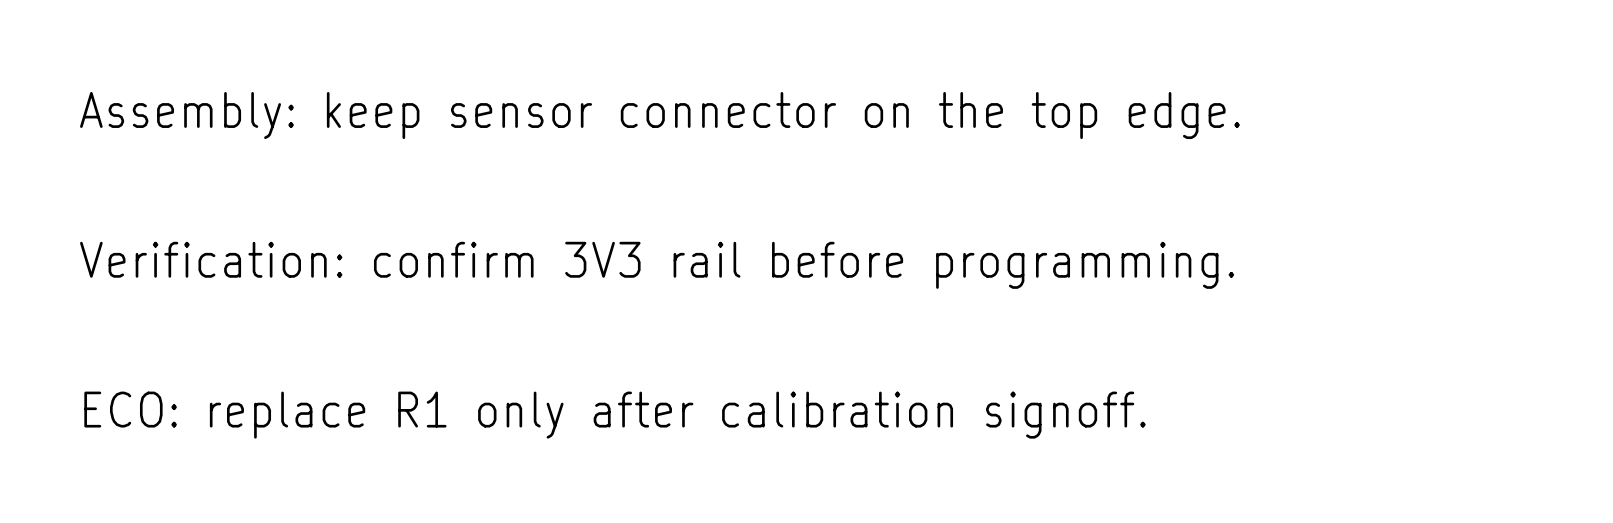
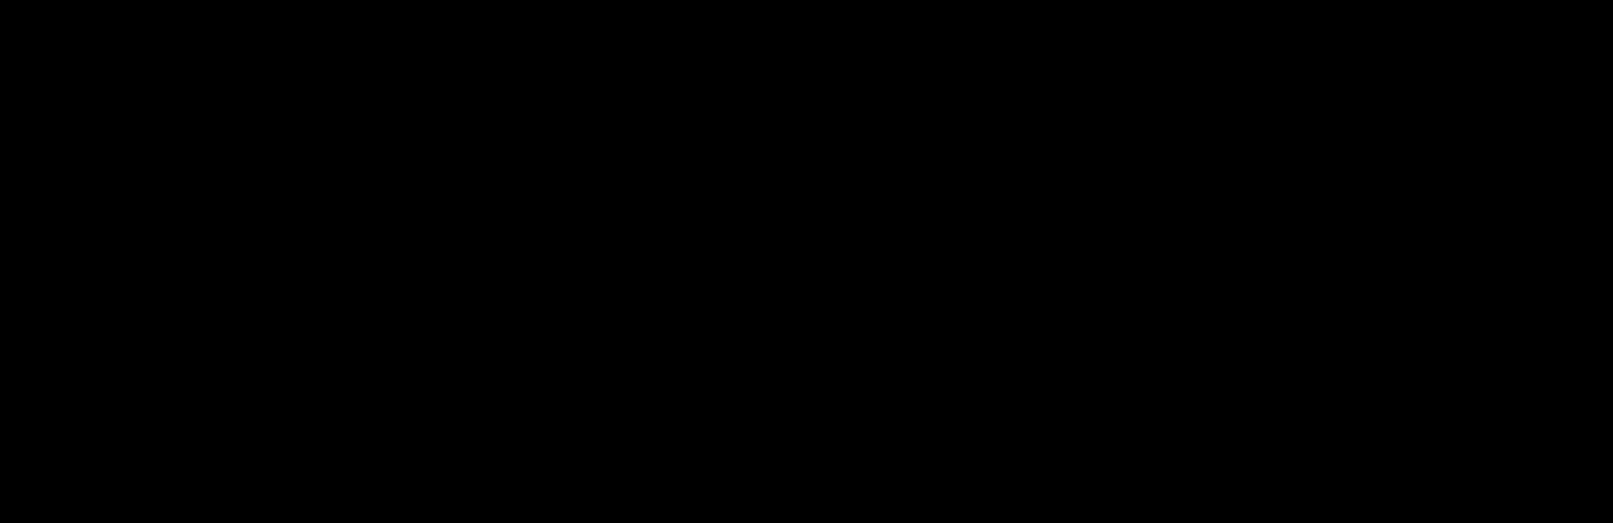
text: Assembly: keep sensor connector on the top edge. (659, 115) -> none
text: Verification: confirm 3V3 rail before programming. (657, 265) -> none
text: ECO: replace R1 only after calibration signoff. (614, 415) -> none

